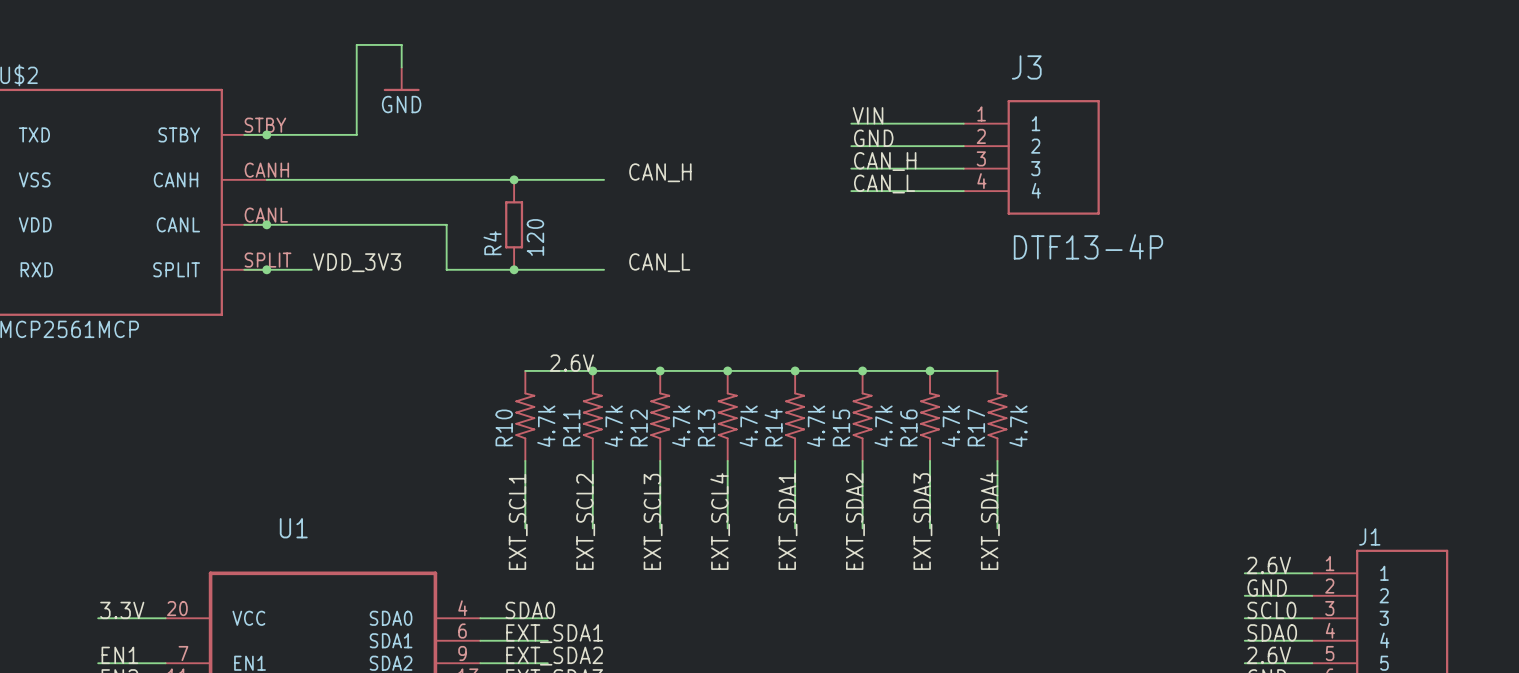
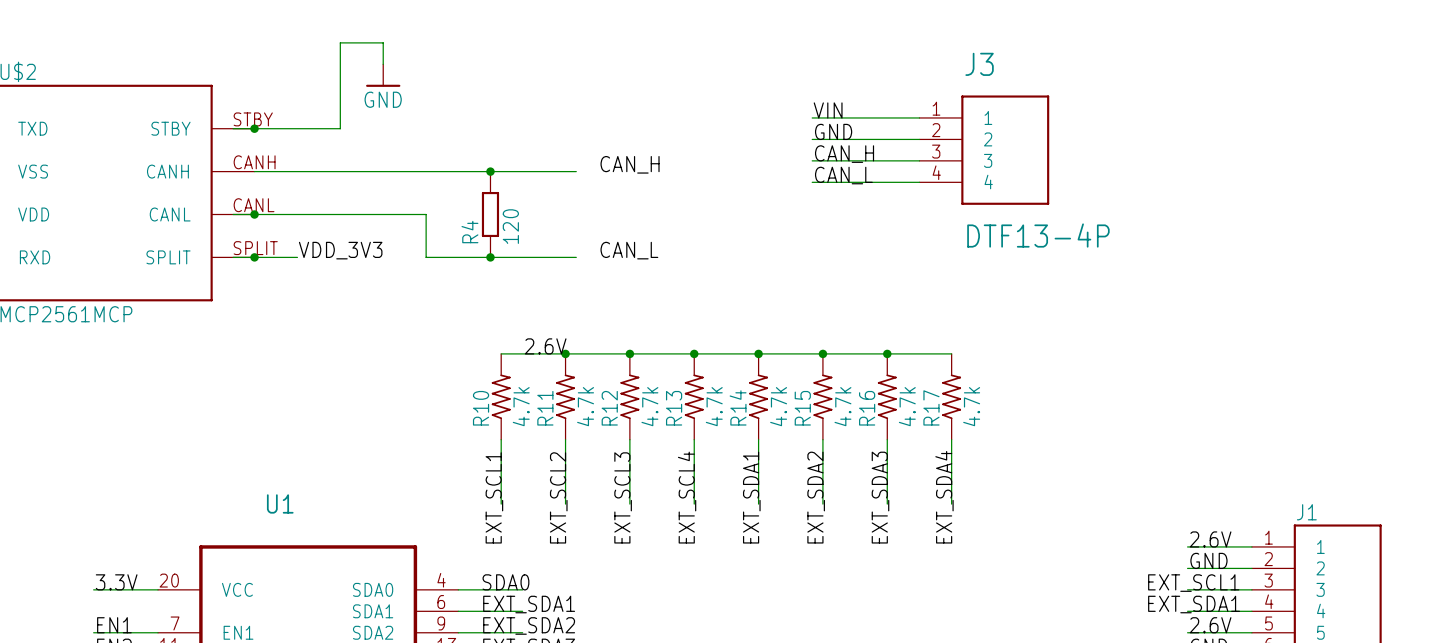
label: SCL0 (1271, 610) -> none
label: none -> EXT_SCL1 (1193, 583)
label: SDA0 (1272, 632) -> none
label: none -> EXT_SDA1 (1194, 604)

